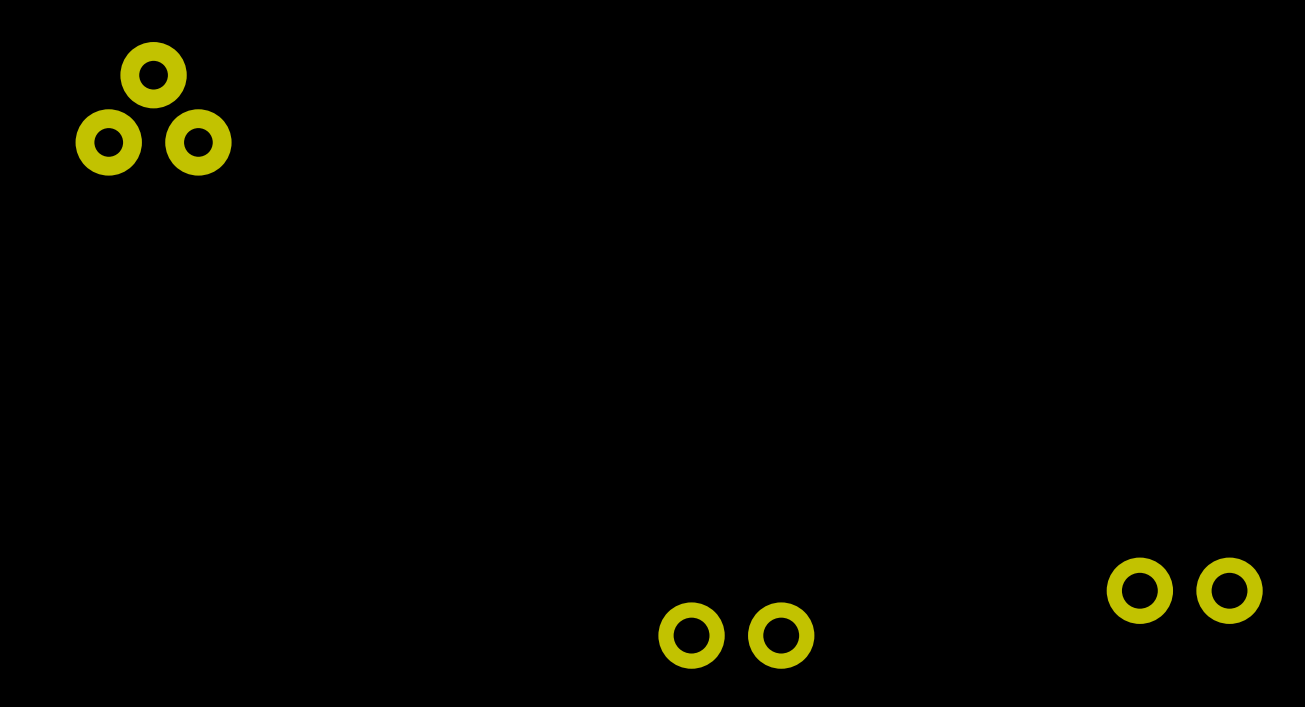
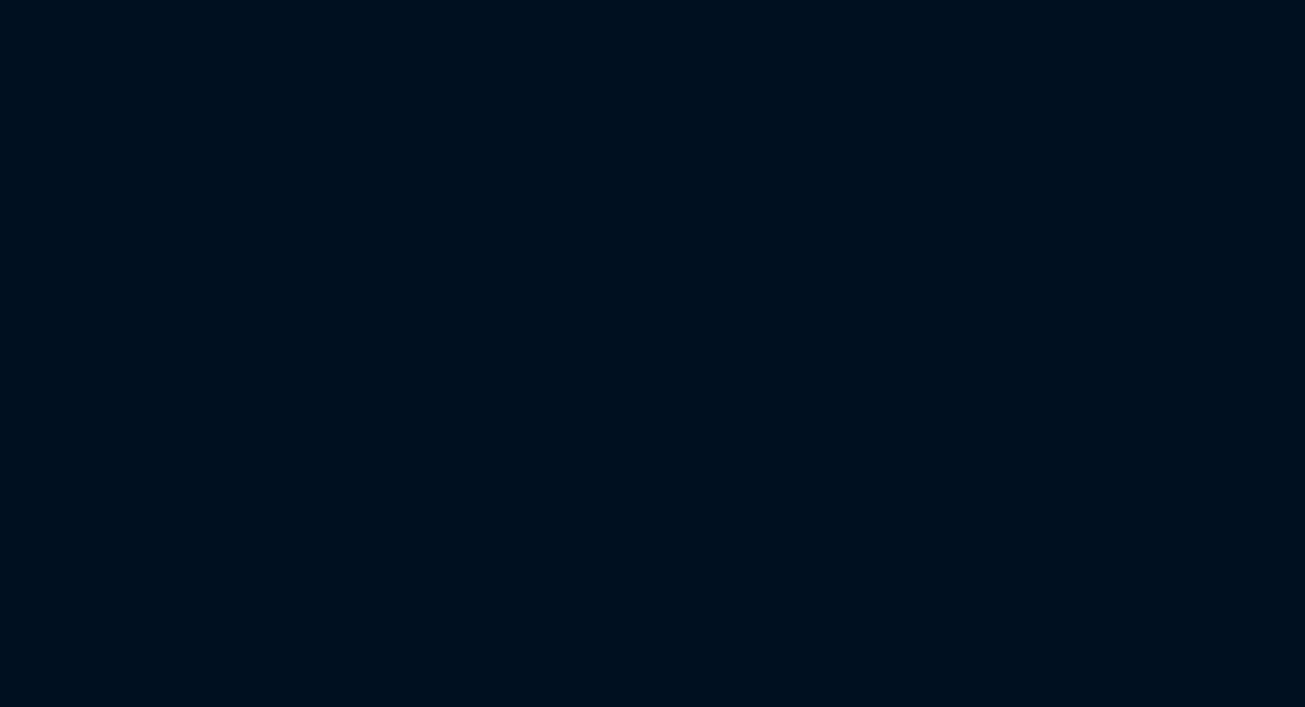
part: (153, 108) -> none
part: (1184, 590) -> none
part: (736, 635) -> none

